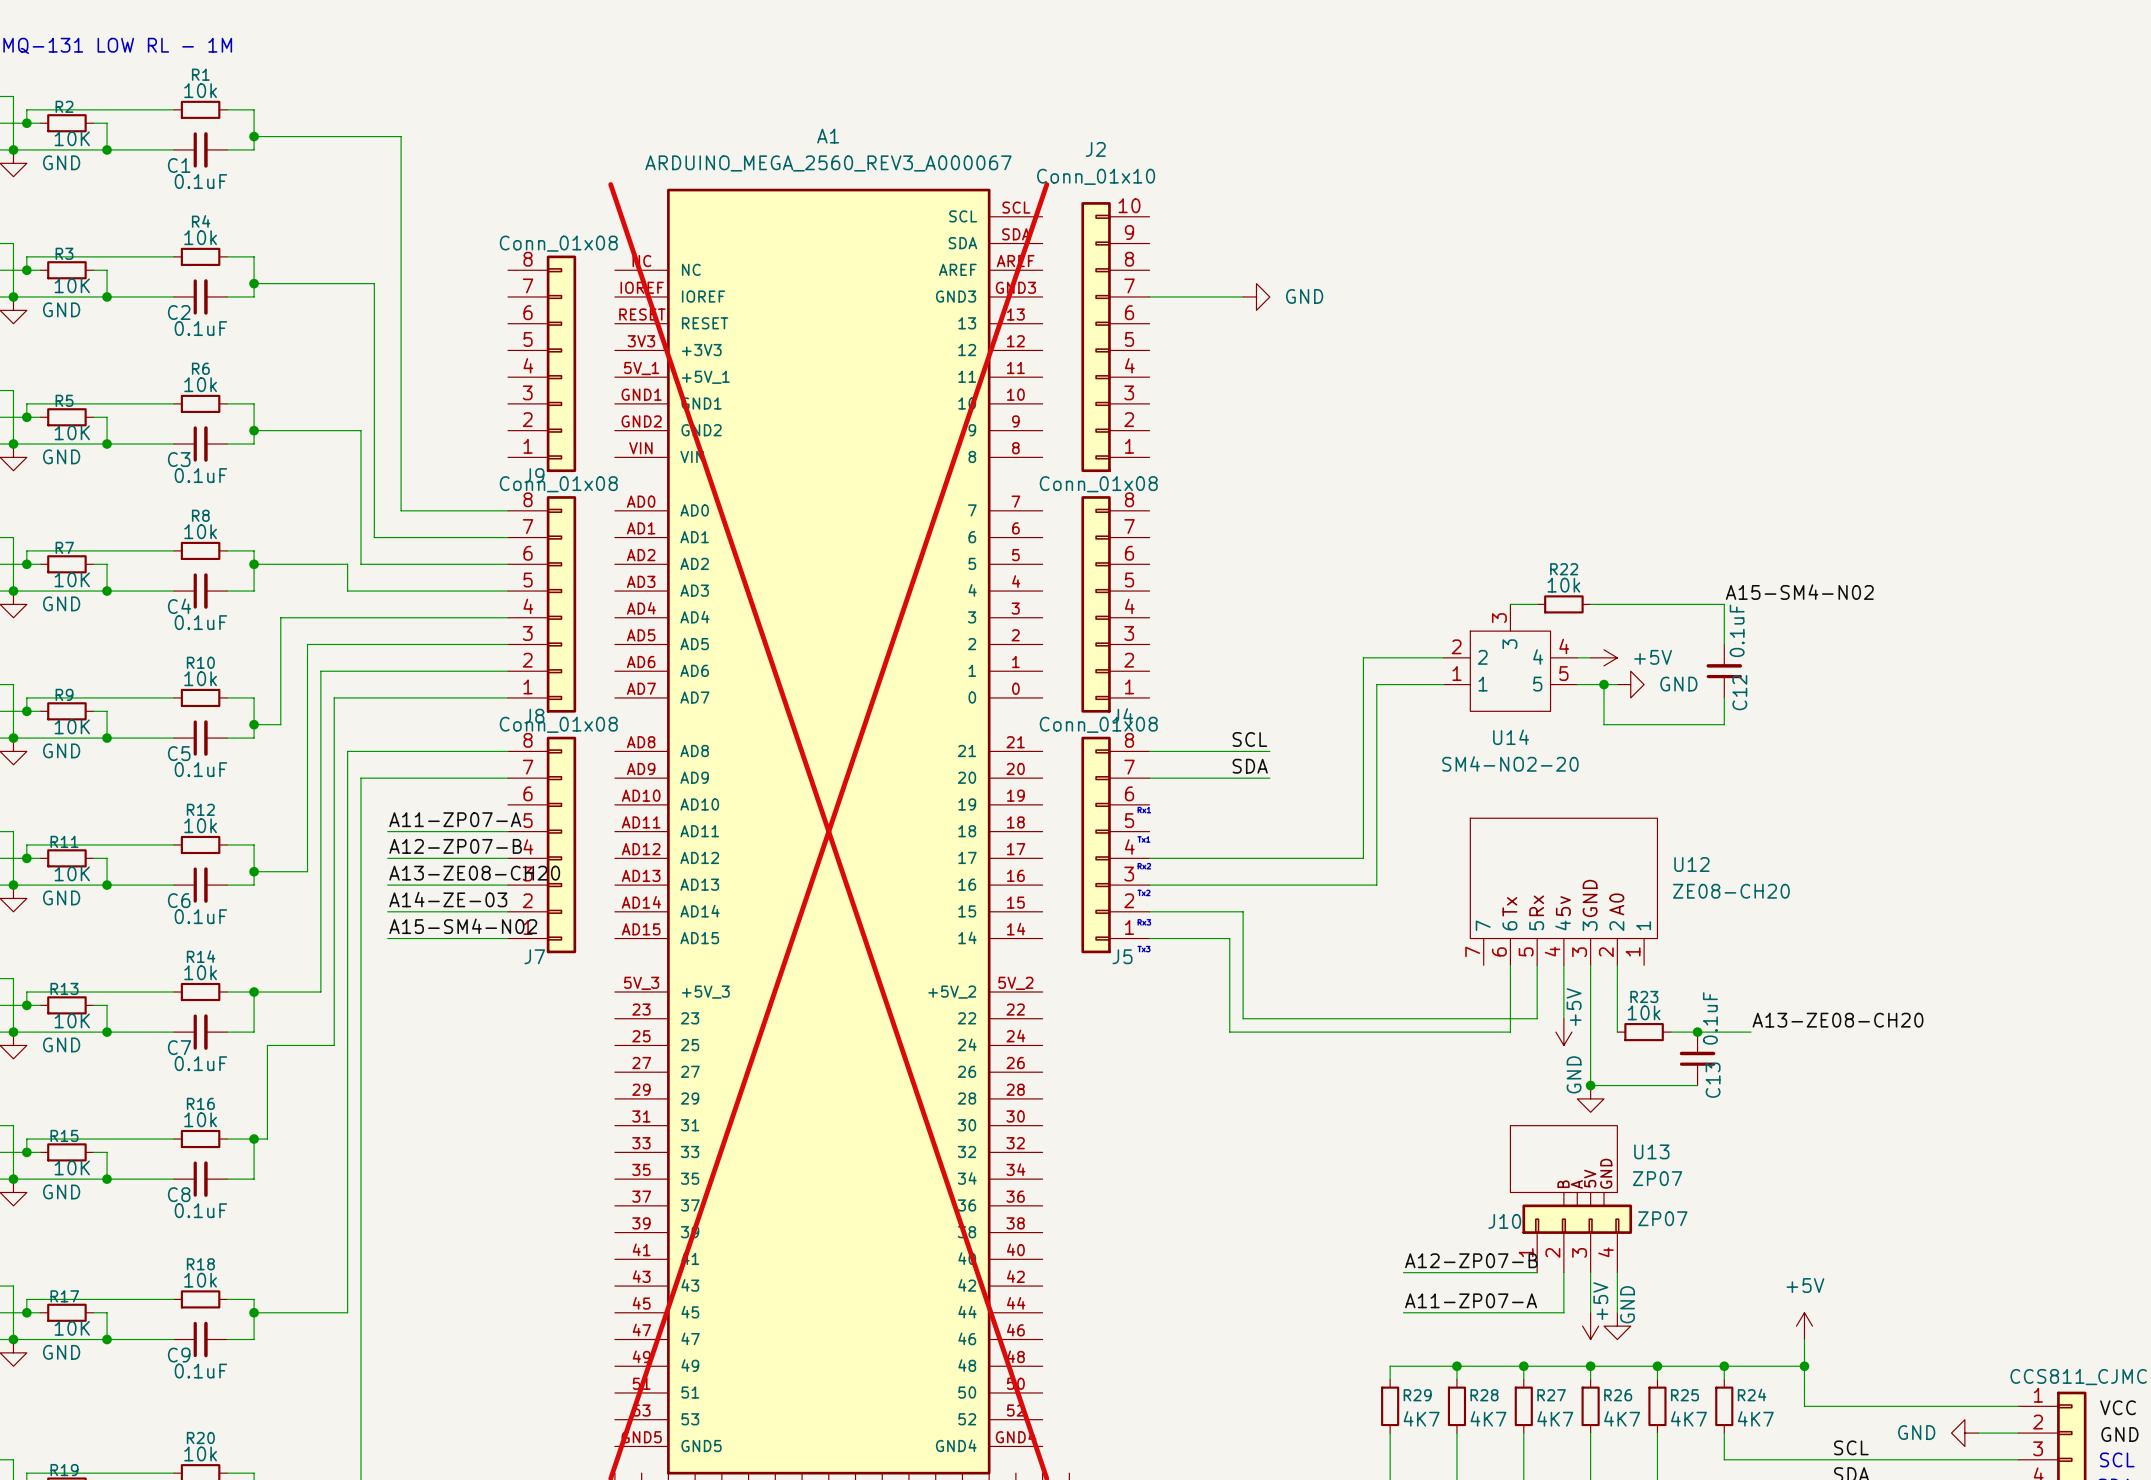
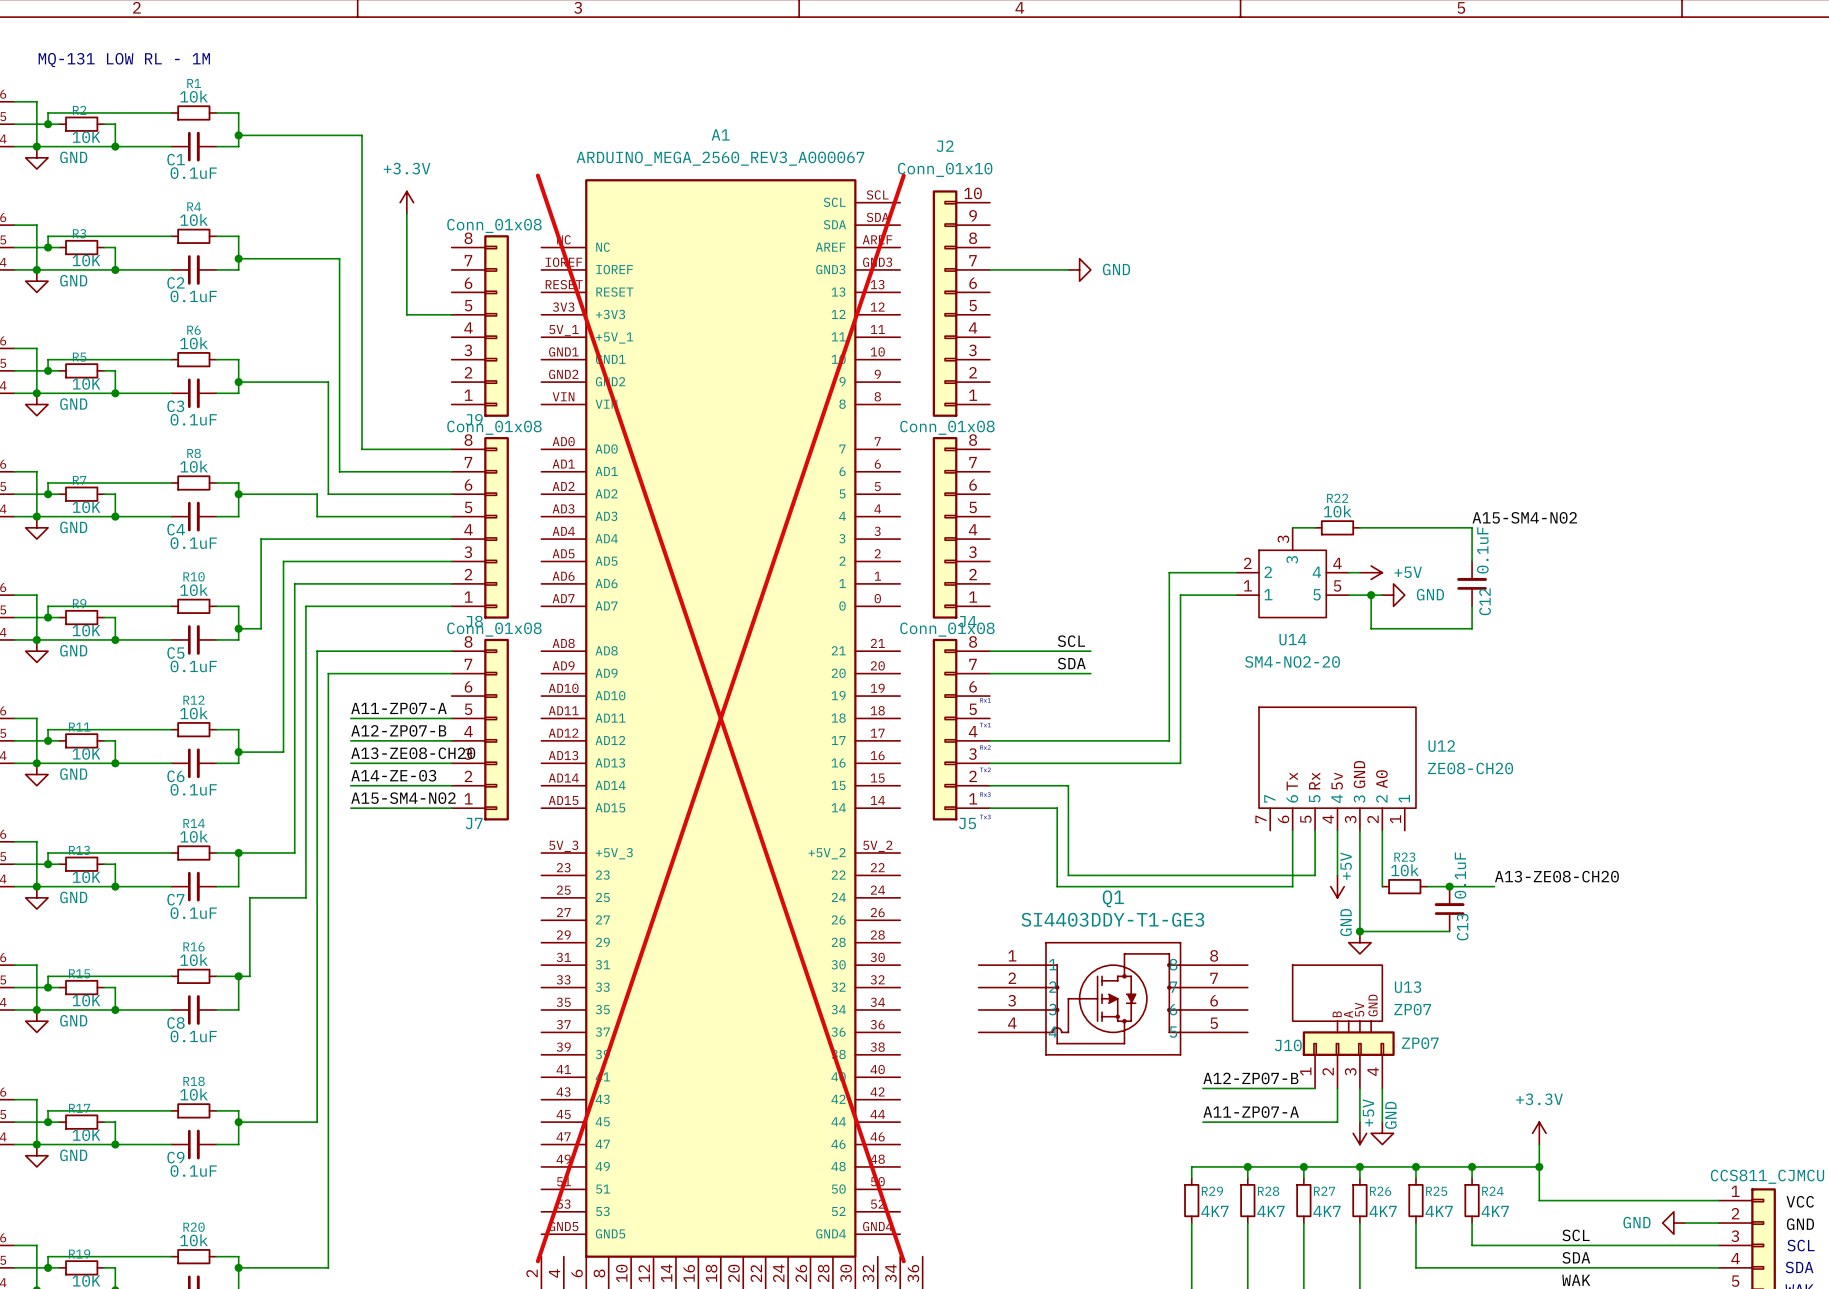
power symbol: none -> +3.3V (406, 202)
wire: none -> (406, 213) (406, 314) (451, 314)
Q1: none -> SI4403DDY-T1-GE3 (1113, 998)
power symbol: +5V (1804, 1326) -> +3.3V (1539, 1133)

